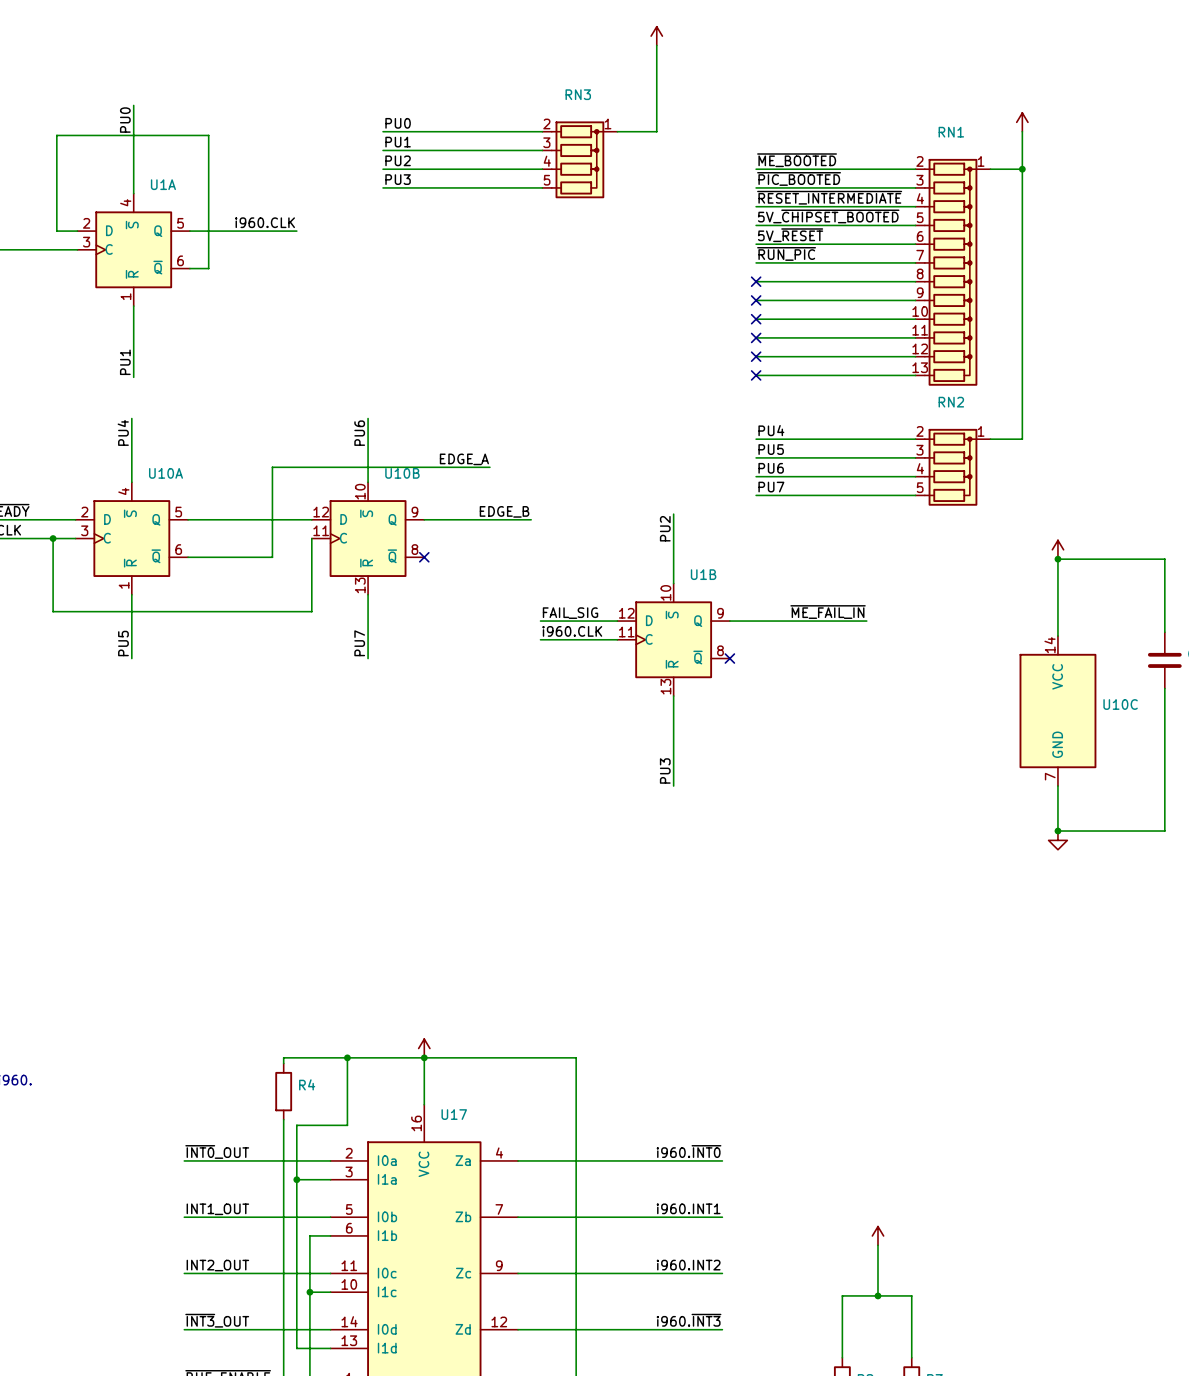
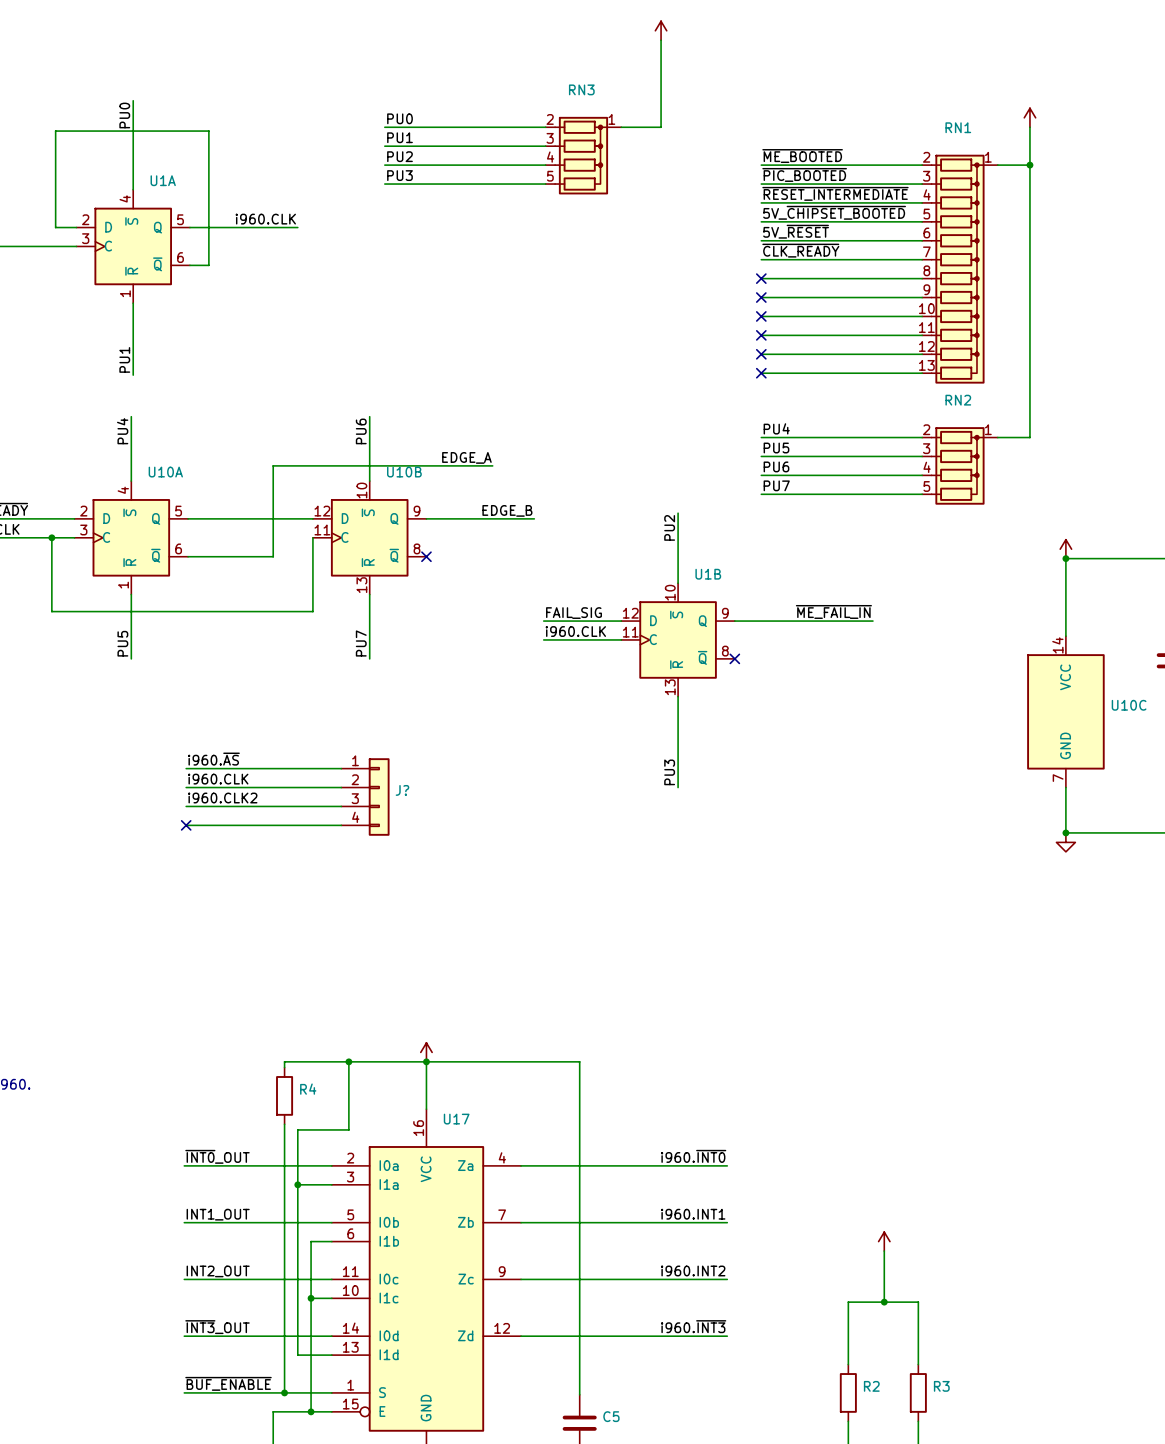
label: ~{RUN_PIC} (786, 253) -> ~{CLK_READY} (800, 250)
label: none -> i960.~{AS} (213, 759)
wire: none -> (186, 768) (341, 768)
label: none -> i960.CLK (218, 779)
wire: none -> (186, 787) (341, 787)
J?: none -> (365, 796)
label: none -> i960.CLK2 (222, 798)
wire: none -> (186, 806) (341, 806)
wire: none -> (186, 825) (341, 825)
no-connect mark: none -> (186, 825)

